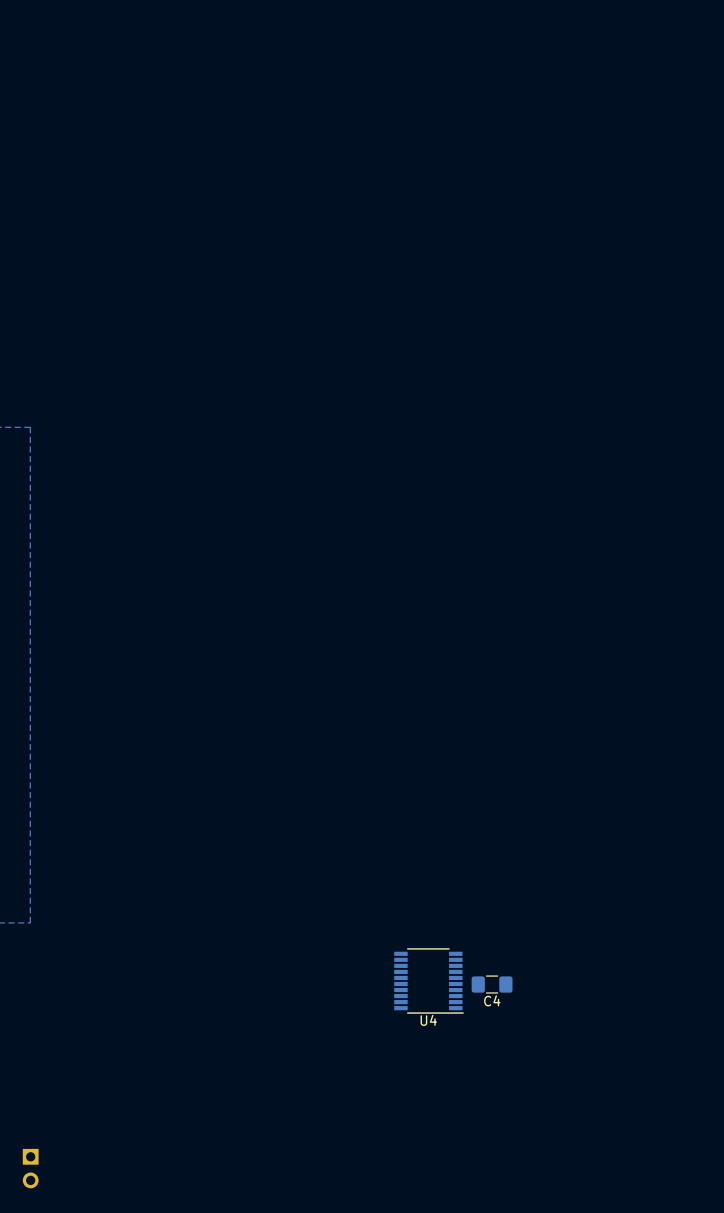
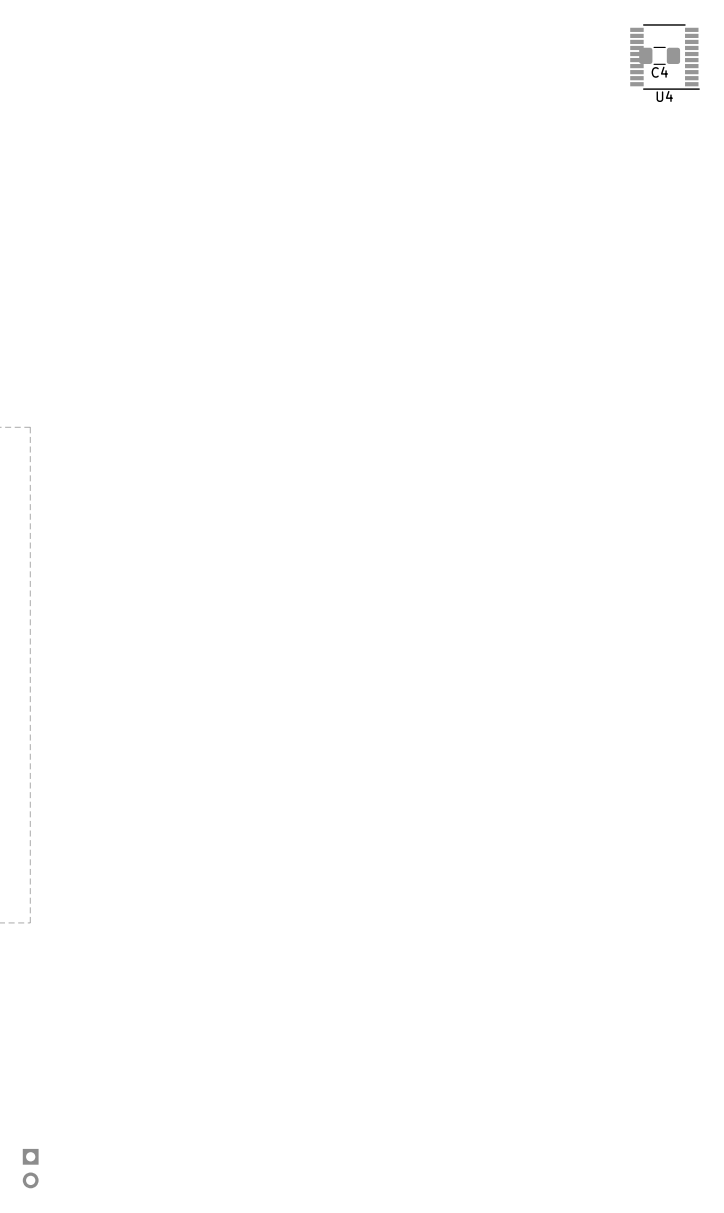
U4 position: (429, 980) -> (665, 57)
C4 position: (492, 984) -> (659, 55)

